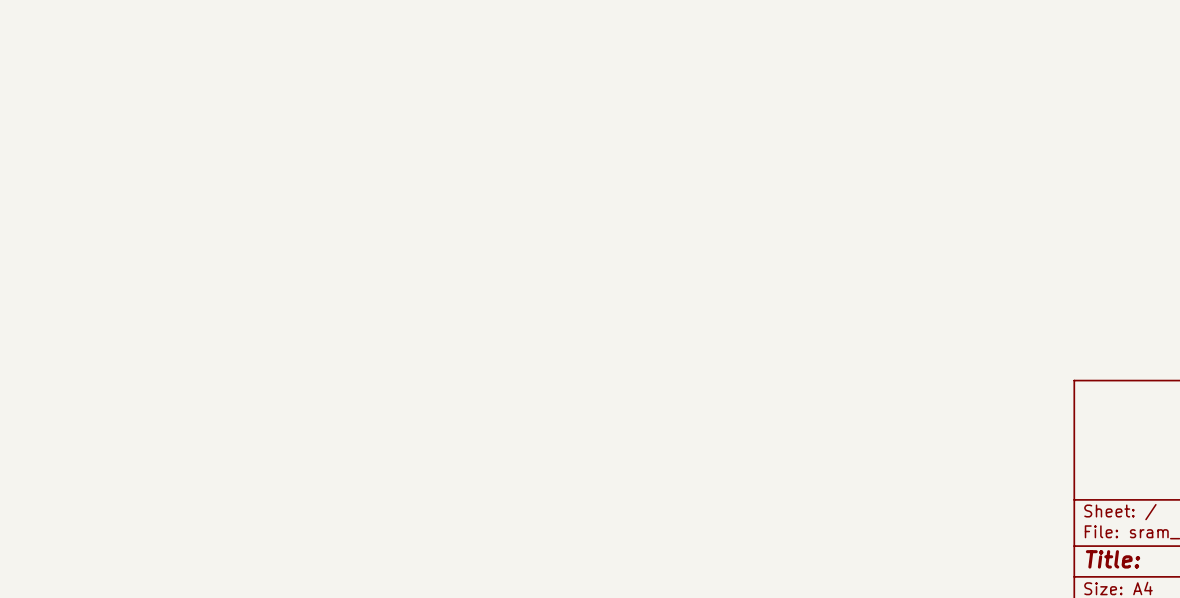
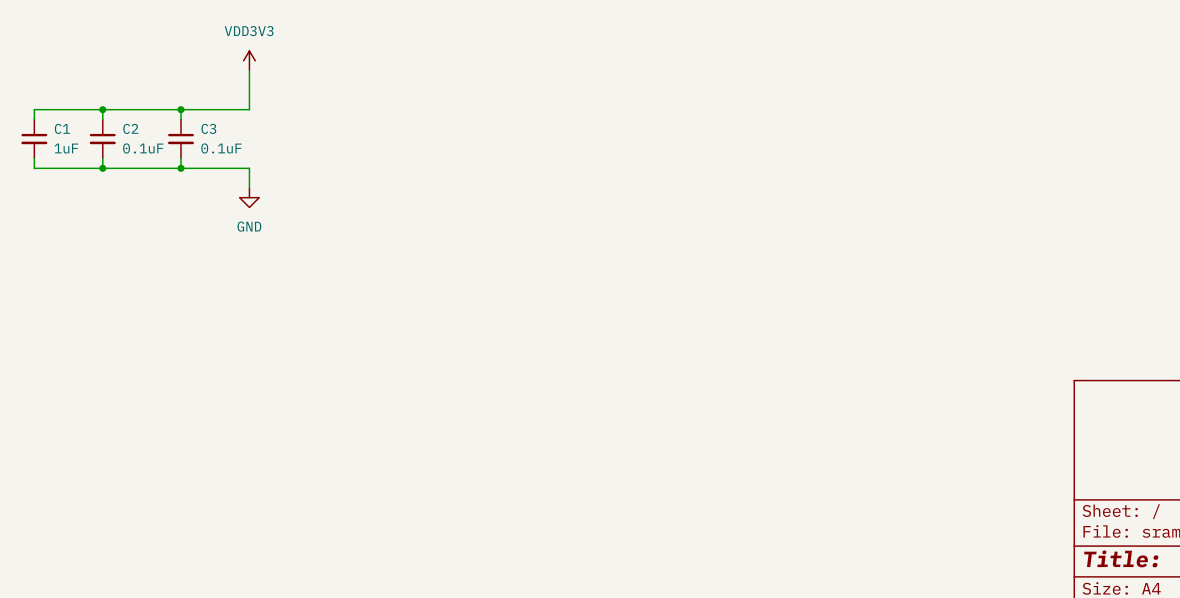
power symbol: none -> VDD3V3 (249, 60)
wire: none -> (249, 70) (249, 109) (34, 109) (34, 119)
wire: none -> (102, 109) (102, 119)
junction: none -> (102, 109)
wire: none -> (181, 109) (181, 119)
junction: none -> (181, 109)
C1: none -> 1uF (34, 139)
C2: none -> 0.1uF (102, 139)
C3: none -> 0.1uF (181, 139)
wire: none -> (34, 158) (34, 168) (249, 168) (249, 187)
wire: none -> (102, 158) (102, 168)
wire: none -> (181, 158) (181, 168)
junction: none -> (102, 168)
junction: none -> (181, 168)
power symbol: none -> GND (249, 197)

